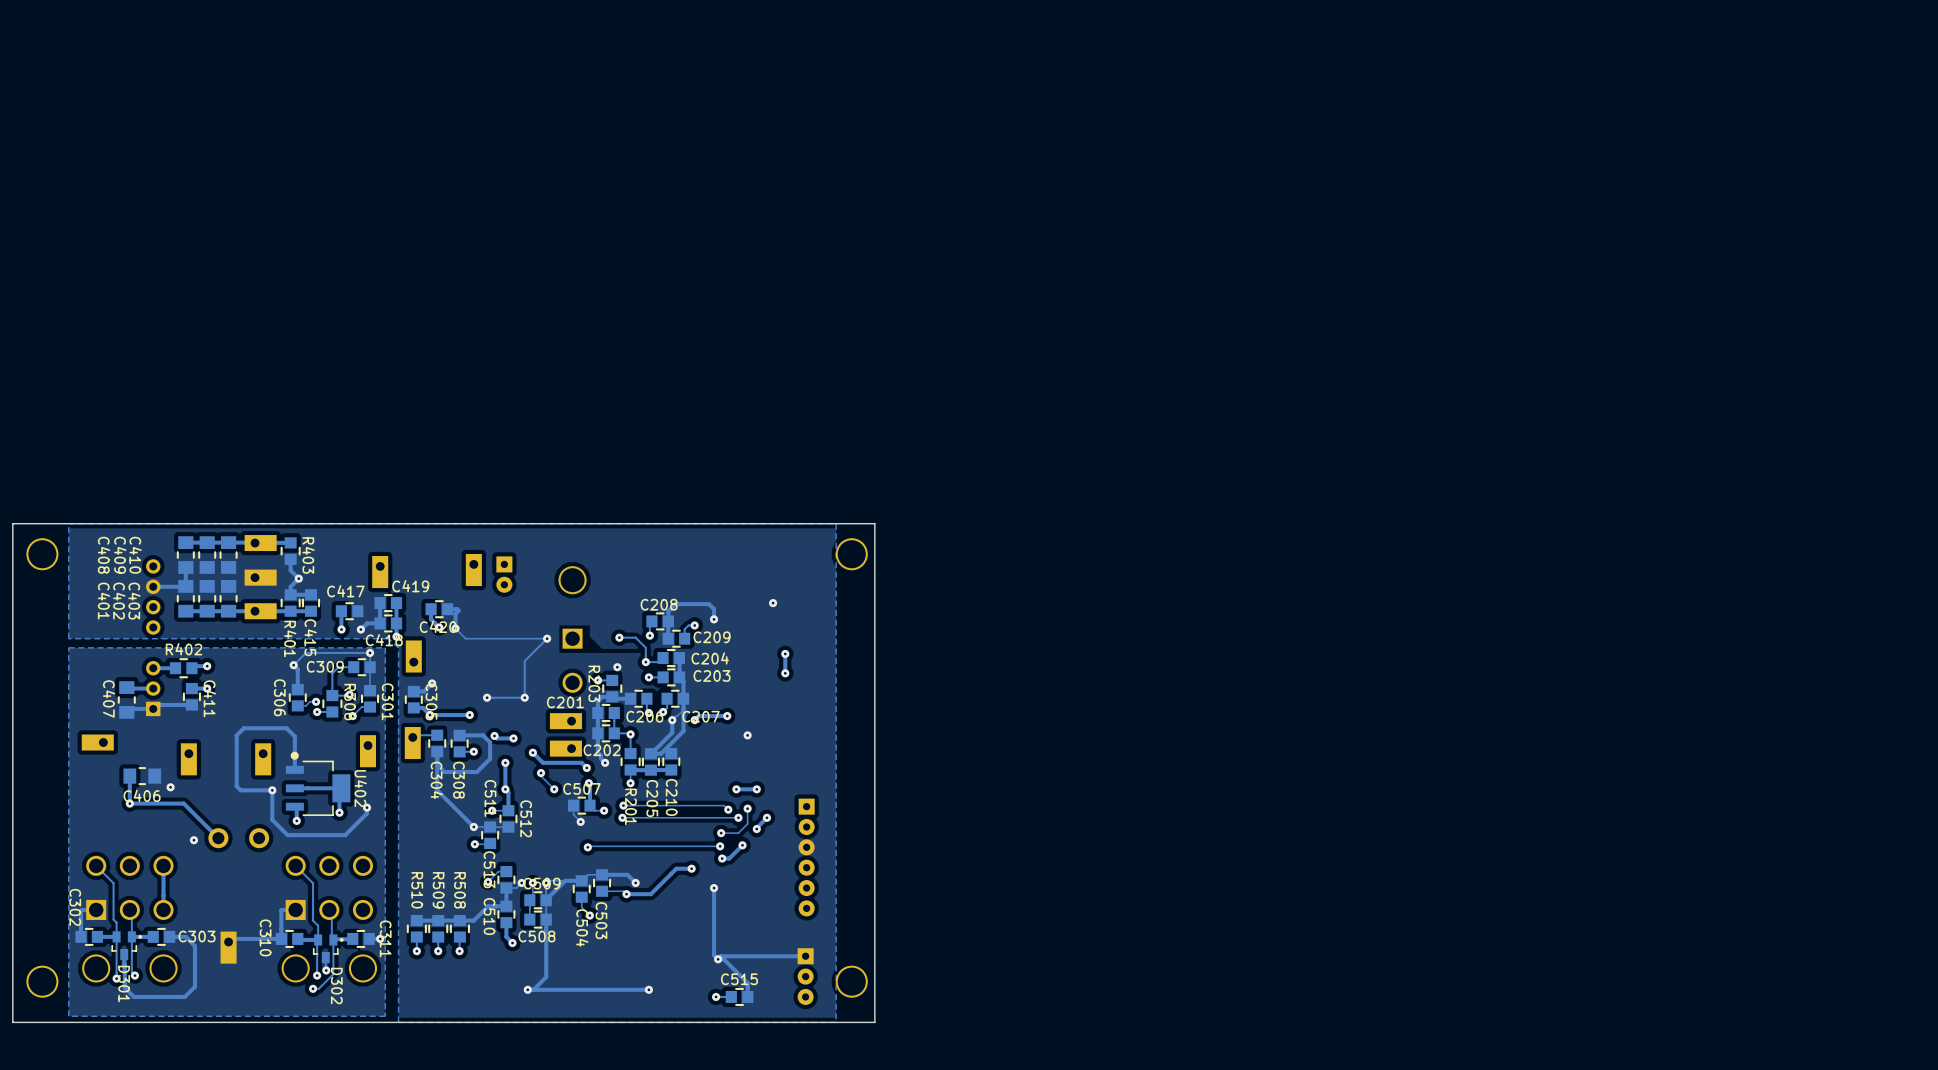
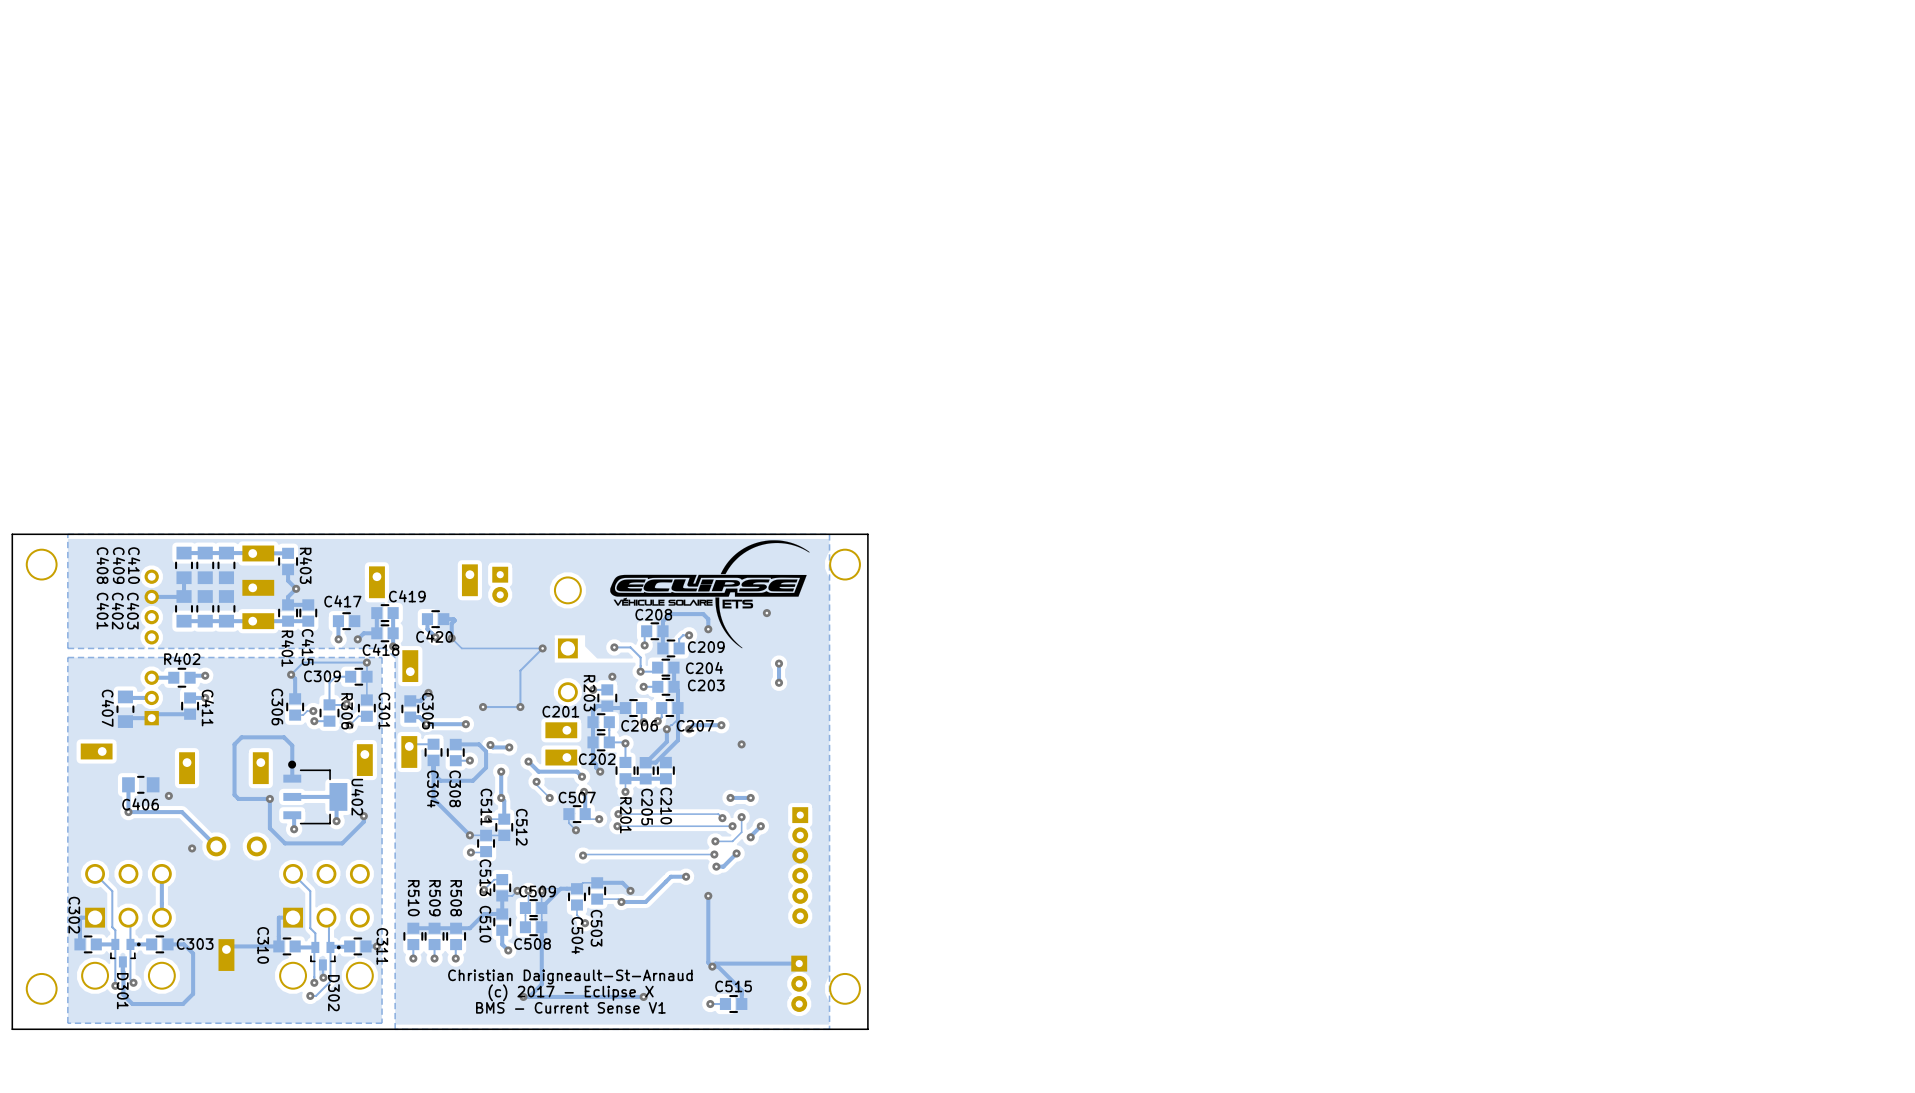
drawing: none -> [610, 540, 810, 649]
text: none -> Christian Daigneault-St-Arnaud (570, 977)
text: none -> (c) 2017 - Eclipse X (571, 992)
text: none -> BMS - Current Sense V1 (570, 1007)

